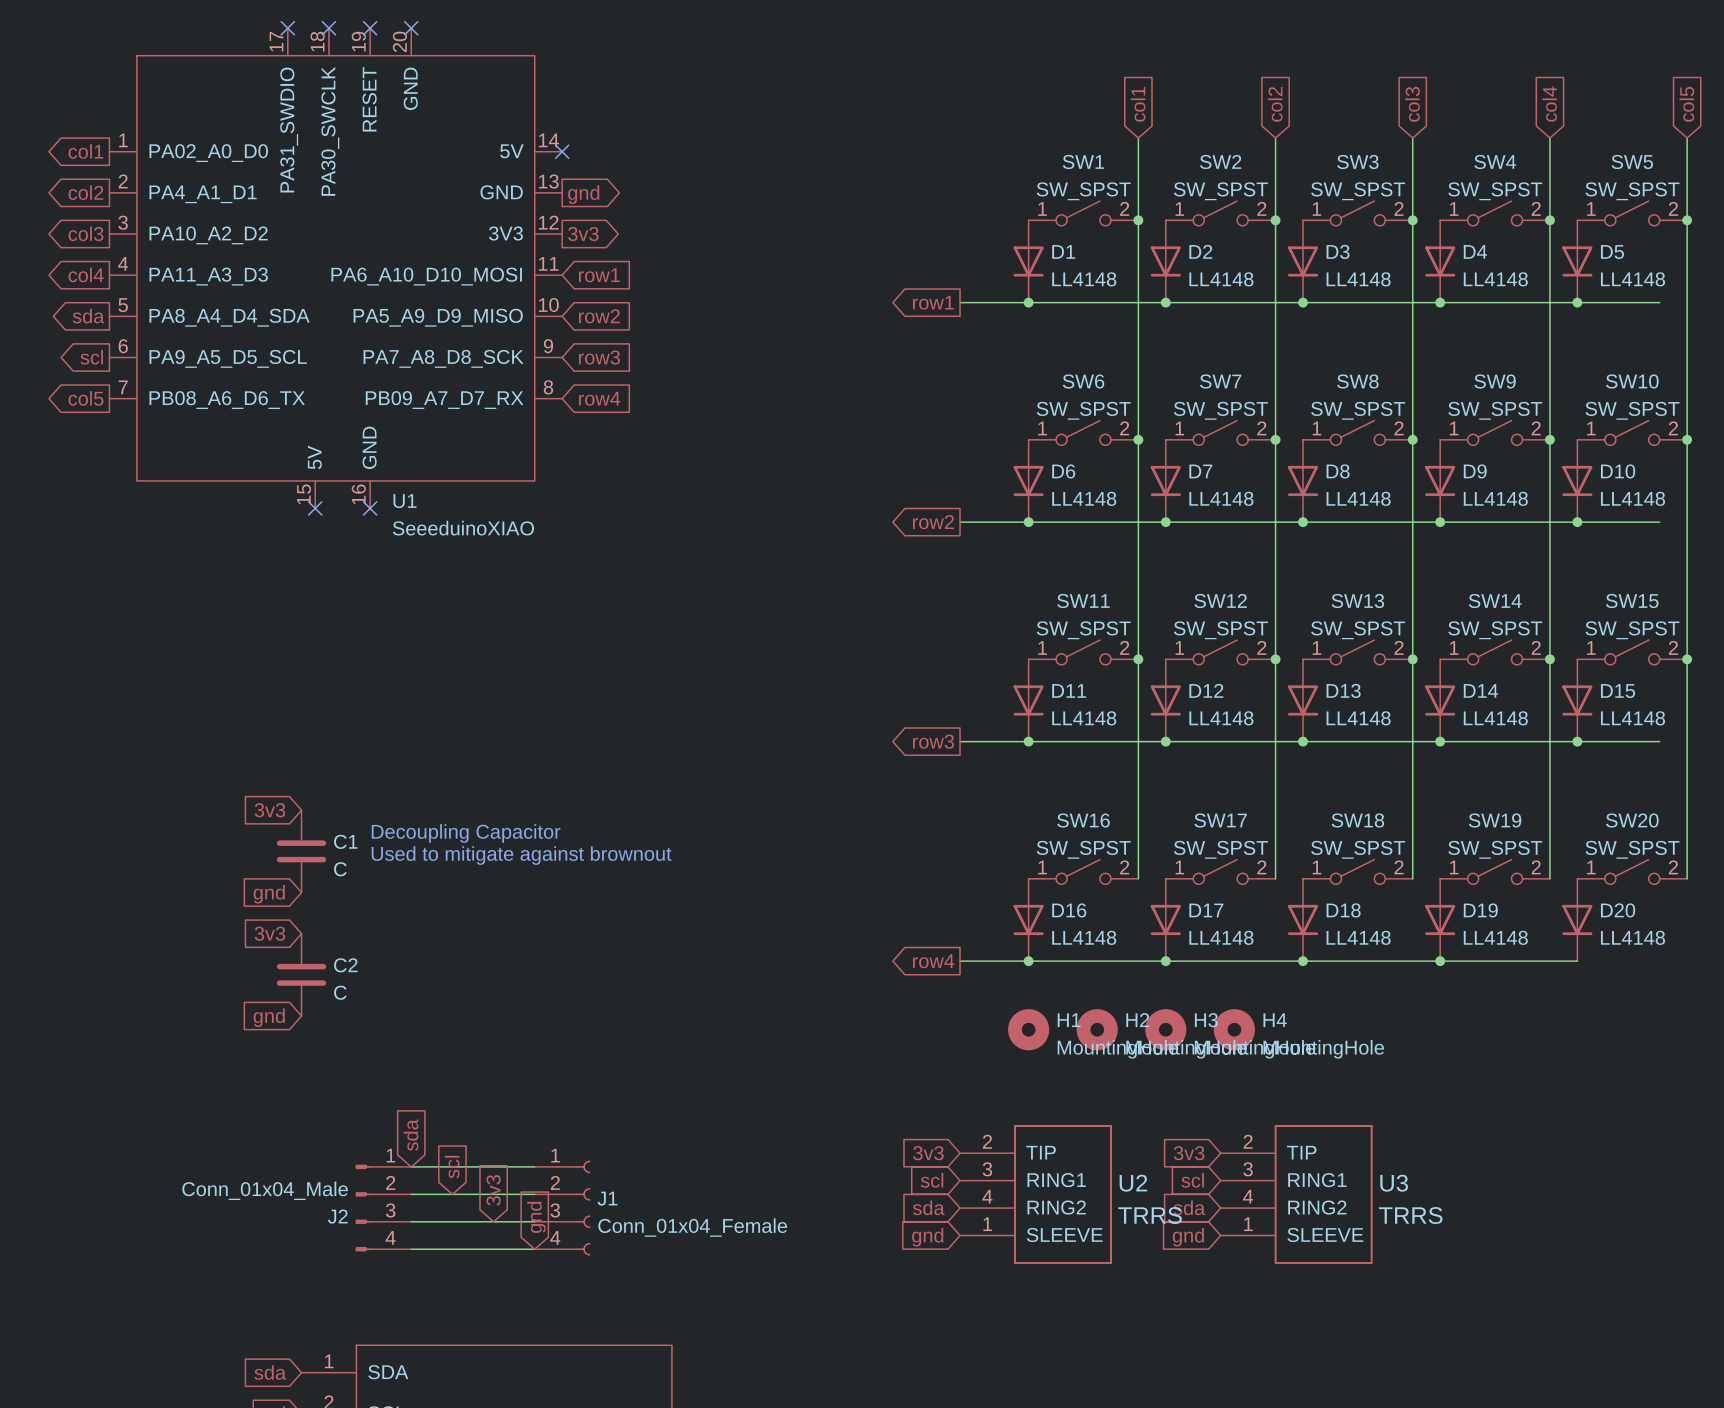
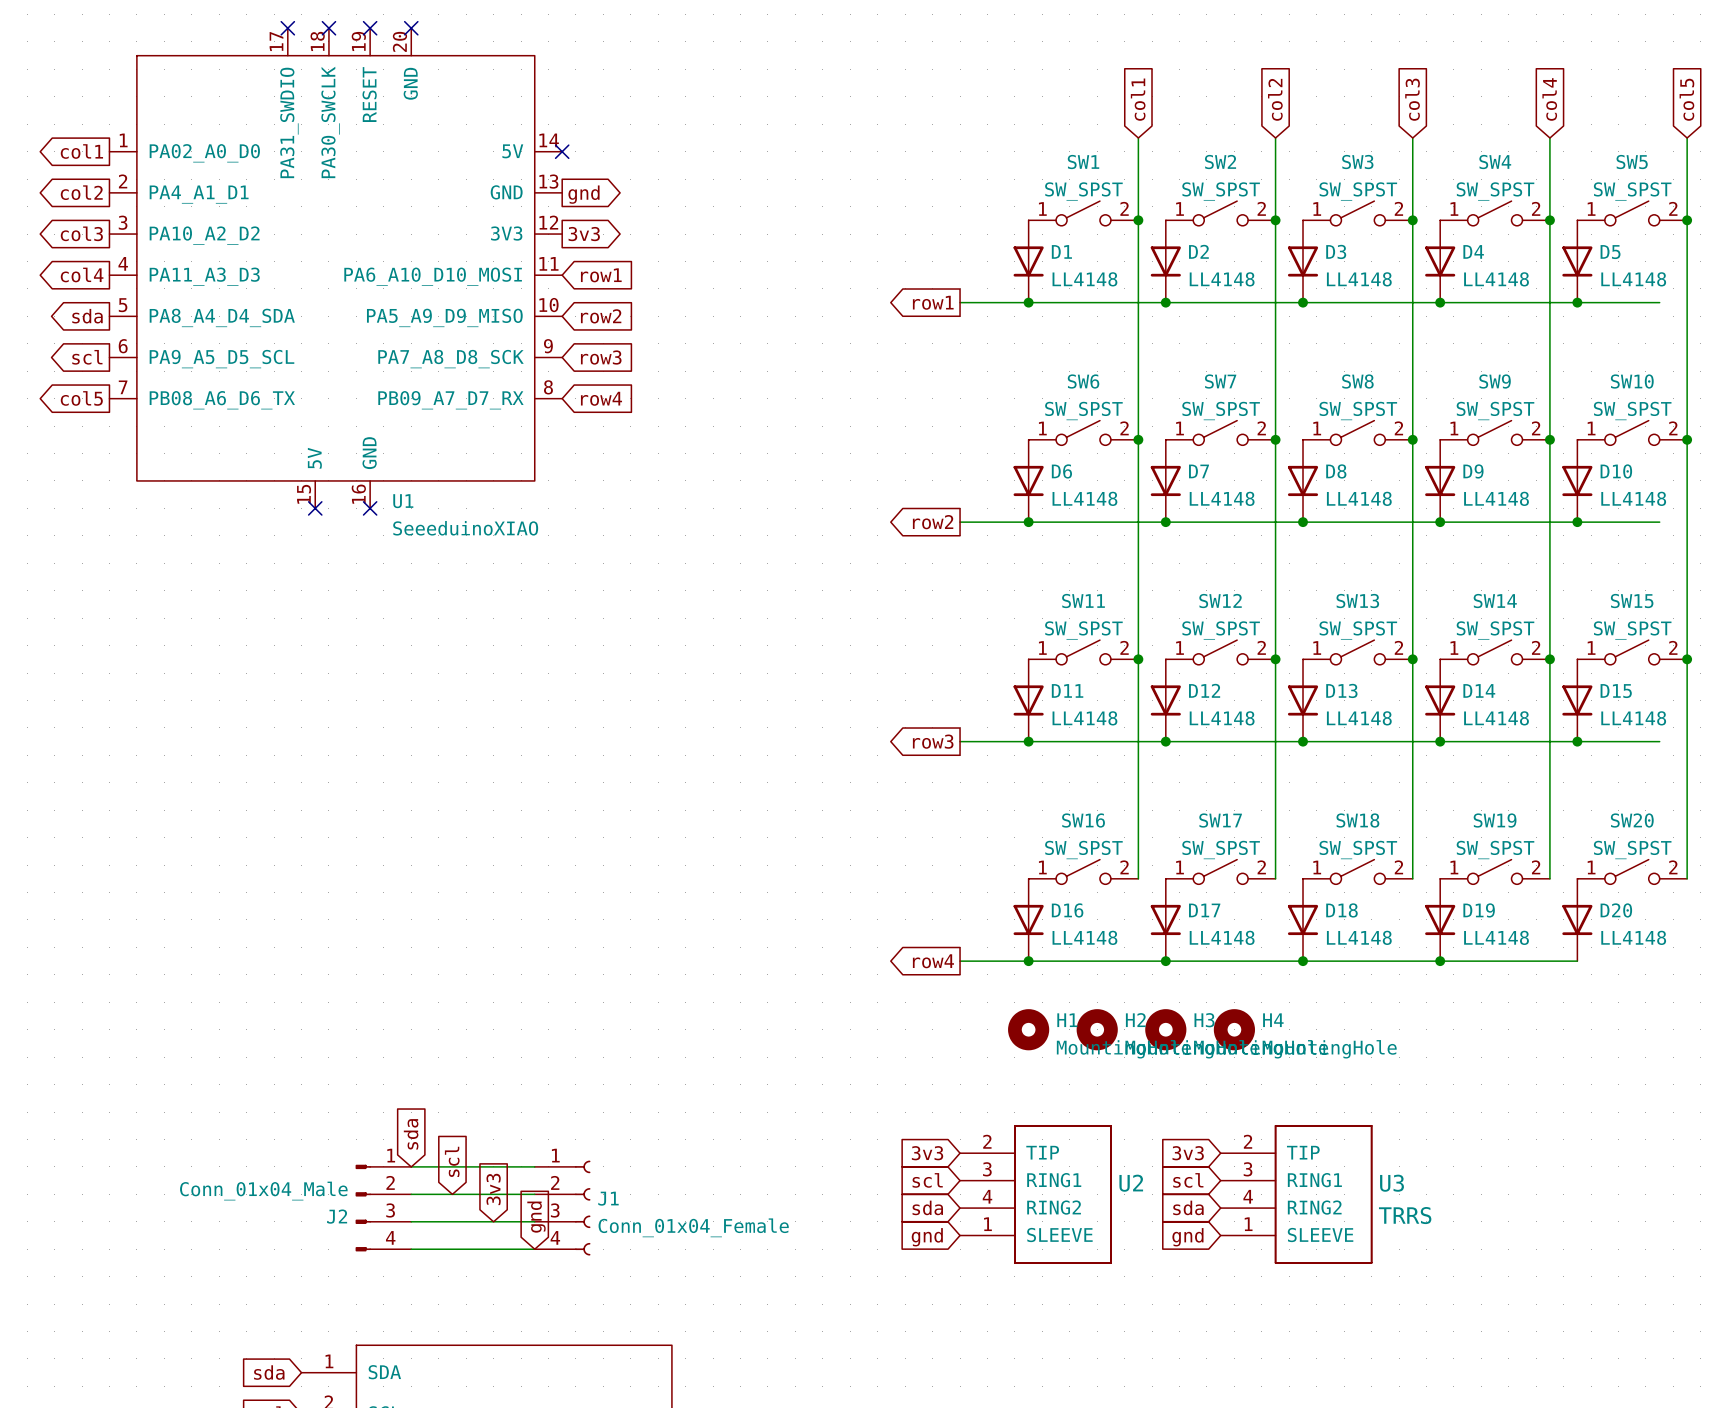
global label: 3v3 (269, 810) -> none
text: Decoupling Capacitor (466, 833) -> none
C1: C (301, 851) -> none
text: Used to mitigate against brownout (521, 855) -> none
global label: gnd (269, 894) -> none
global label: 3v3 (269, 933) -> none
C2: C (301, 974) -> none
global label: gnd (269, 1017) -> none
U2 value: TRRS (1150, 1215) -> none

